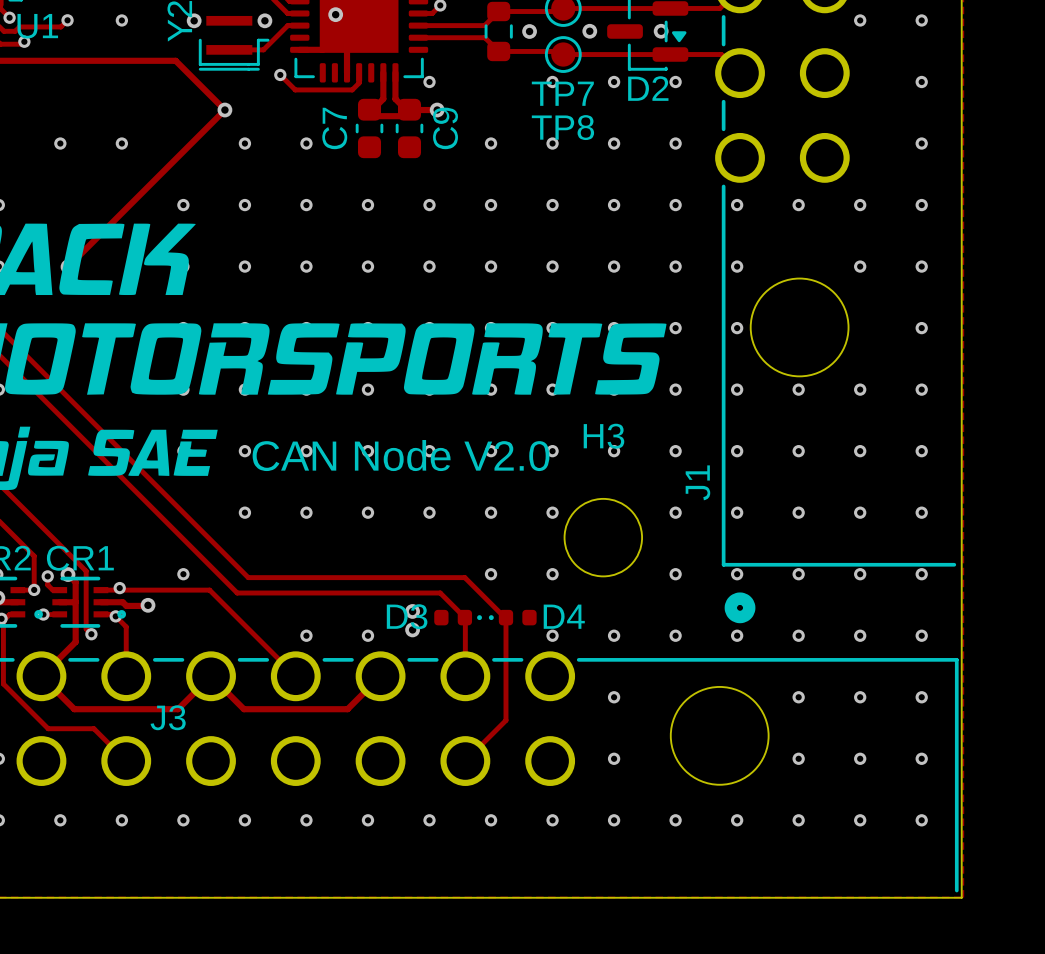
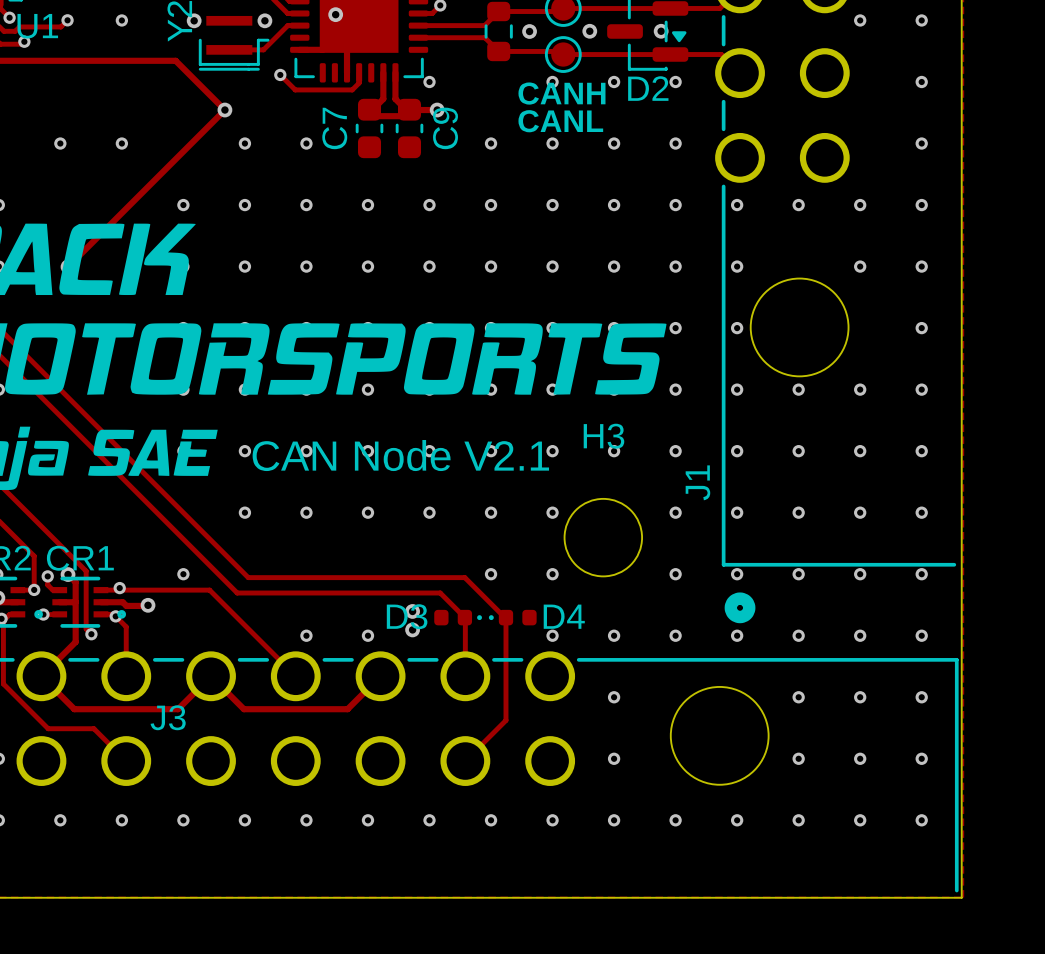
text: none -> CANH (561, 93)
TP7 name: TP7 (562, 93) -> none
text: none -> CANL (560, 121)
TP8 name: TP8 (562, 127) -> none
text: CAN Node V2.0 (401, 455) -> CAN Node V2.1 (400, 455)

